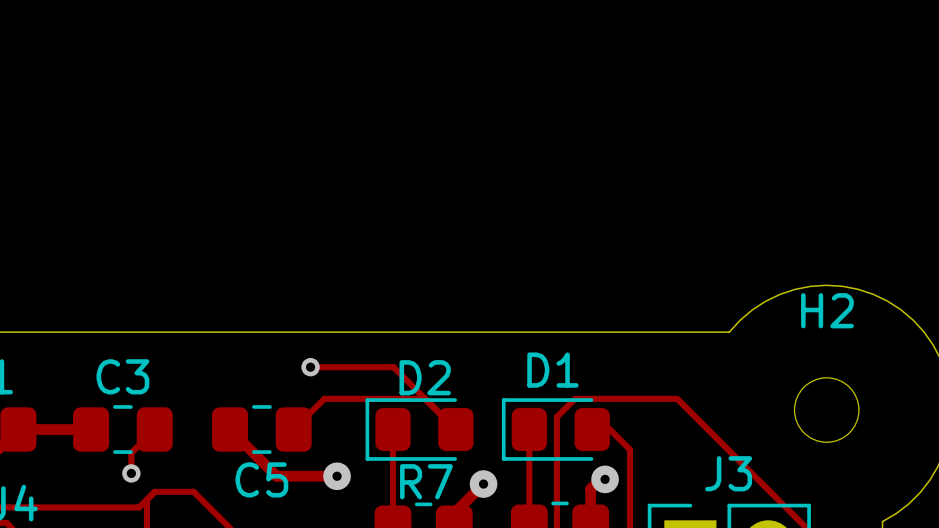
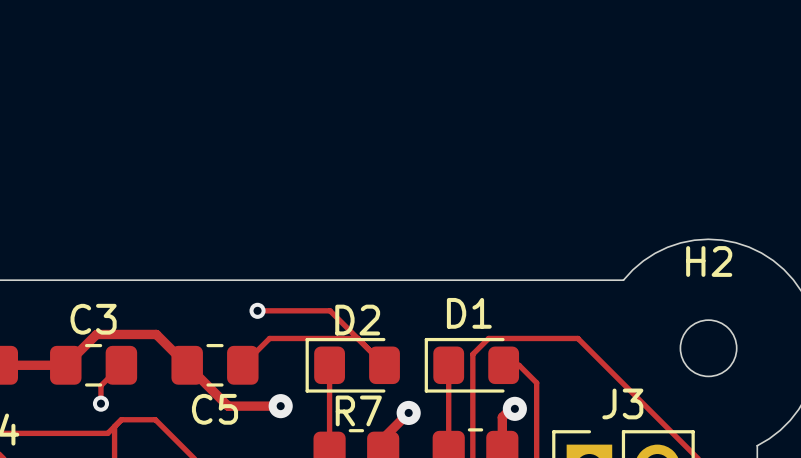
track: none -> (65, 365) (96, 334) (156, 334) (187, 365)

